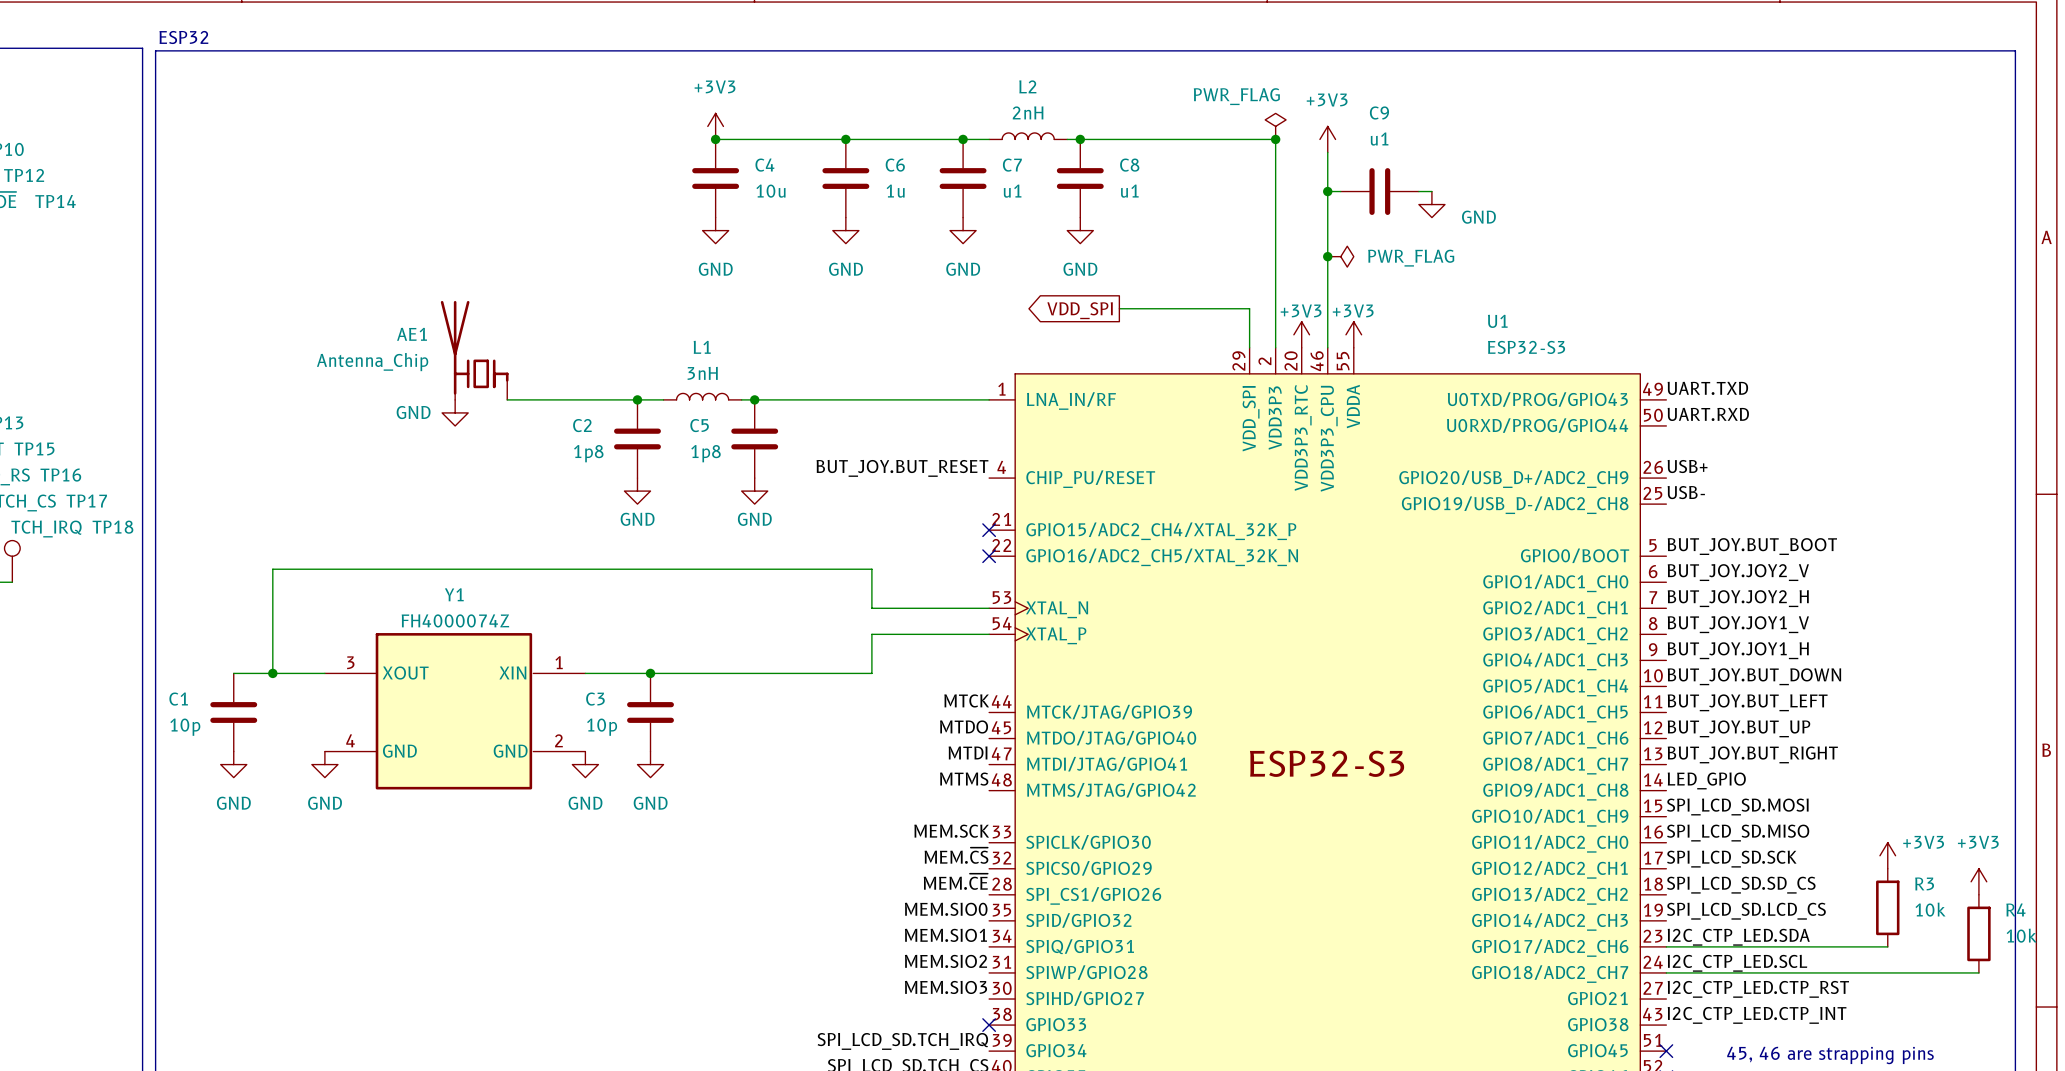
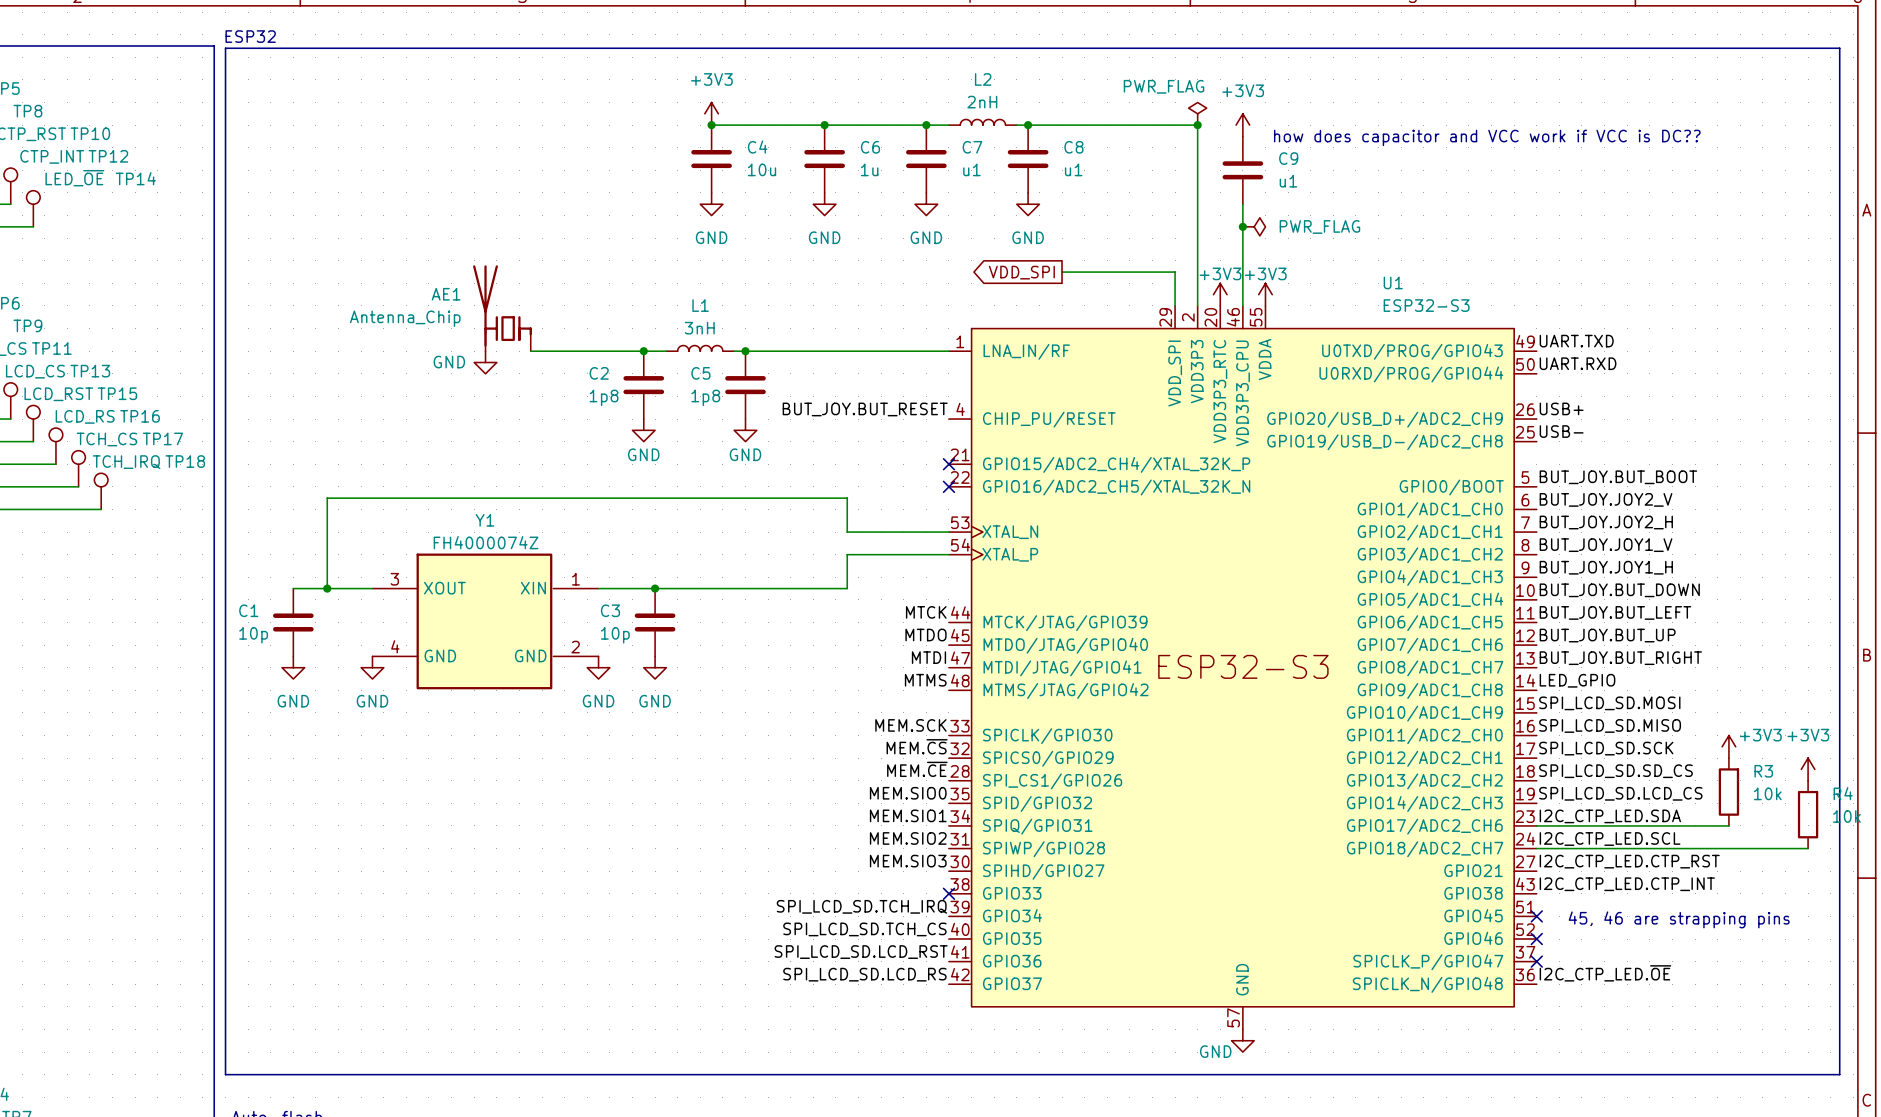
C9 name position: C9 (1379, 112) -> C9 (1288, 158)
text: none -> how does capacitor and VCC work if VCC is DC?? (1487, 137)
wire: (1327, 191) (1340, 191) -> none
junction: (1327, 191) -> none
C9 rotation: 0° (1379, 191) -> 90° clockwise (1242, 170)
C9 position: (1379, 191) -> (1242, 170)
wire: (1418, 191) (1431, 191) -> none
power symbol: GND (1431, 204) -> none

